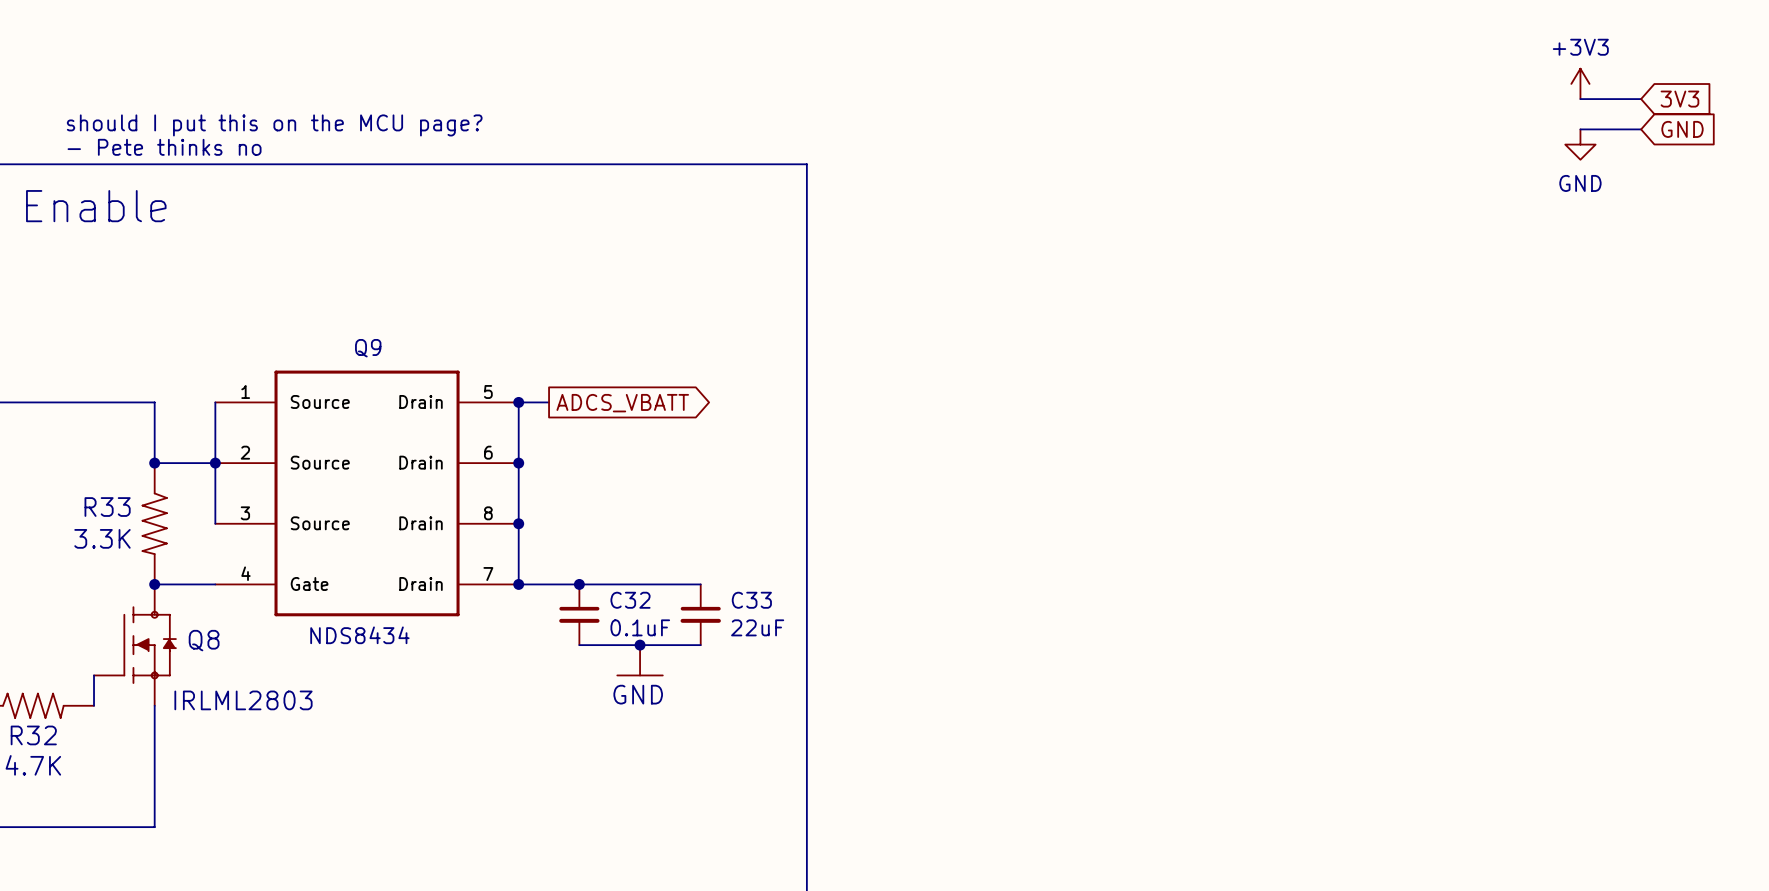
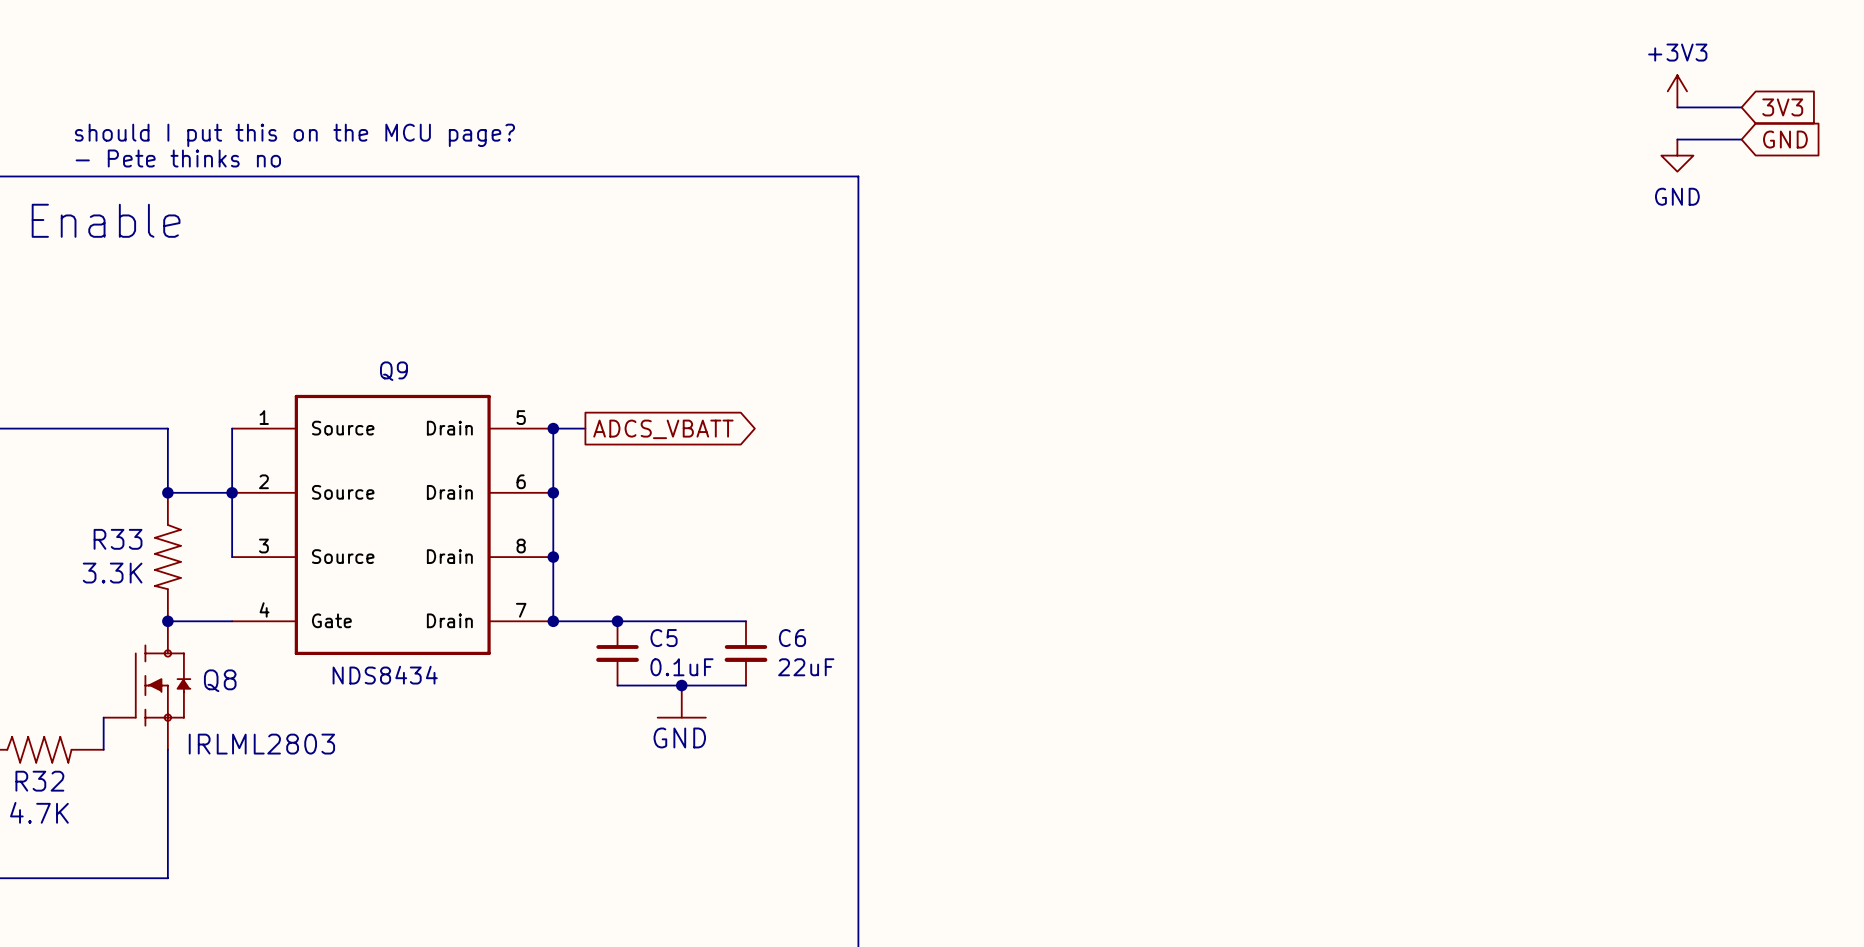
C32 name: C32 (630, 600) -> C5 (664, 638)
C33 name: C33 (751, 600) -> C6 (792, 638)

